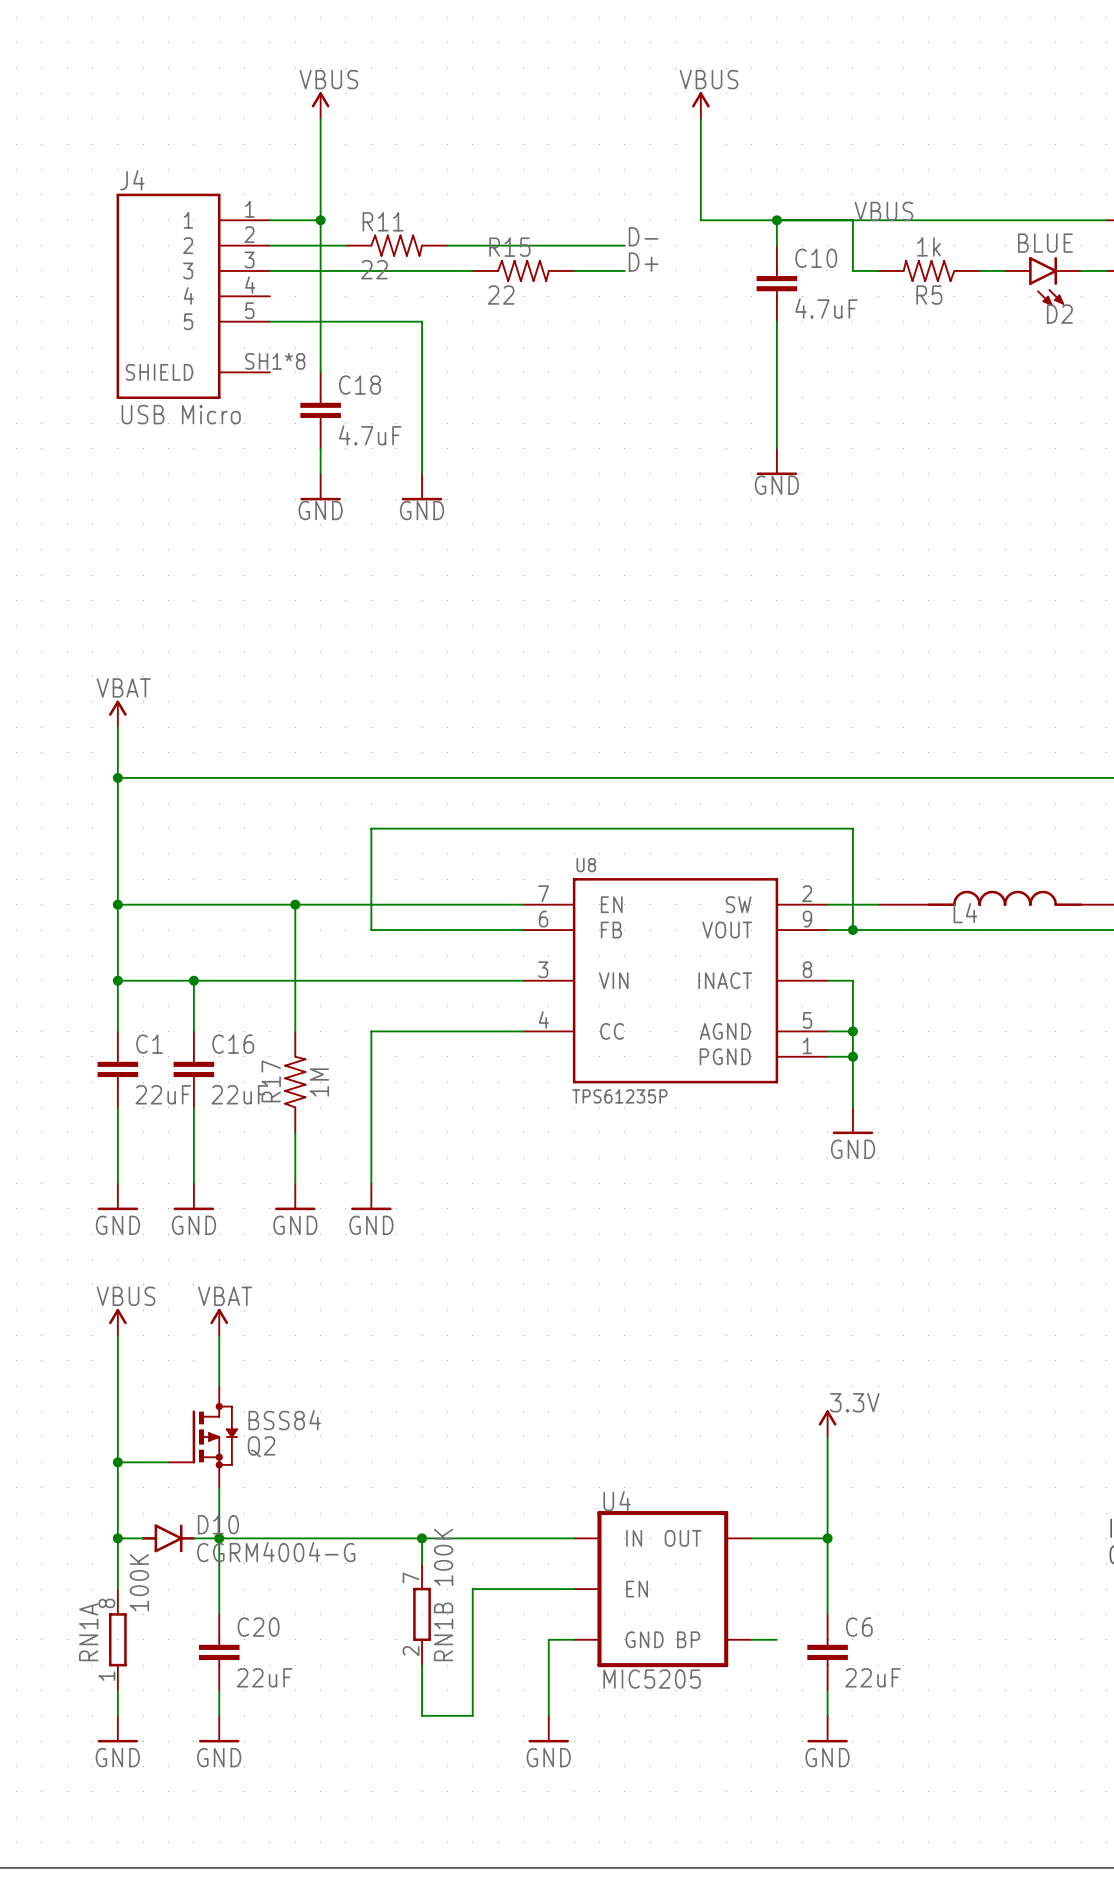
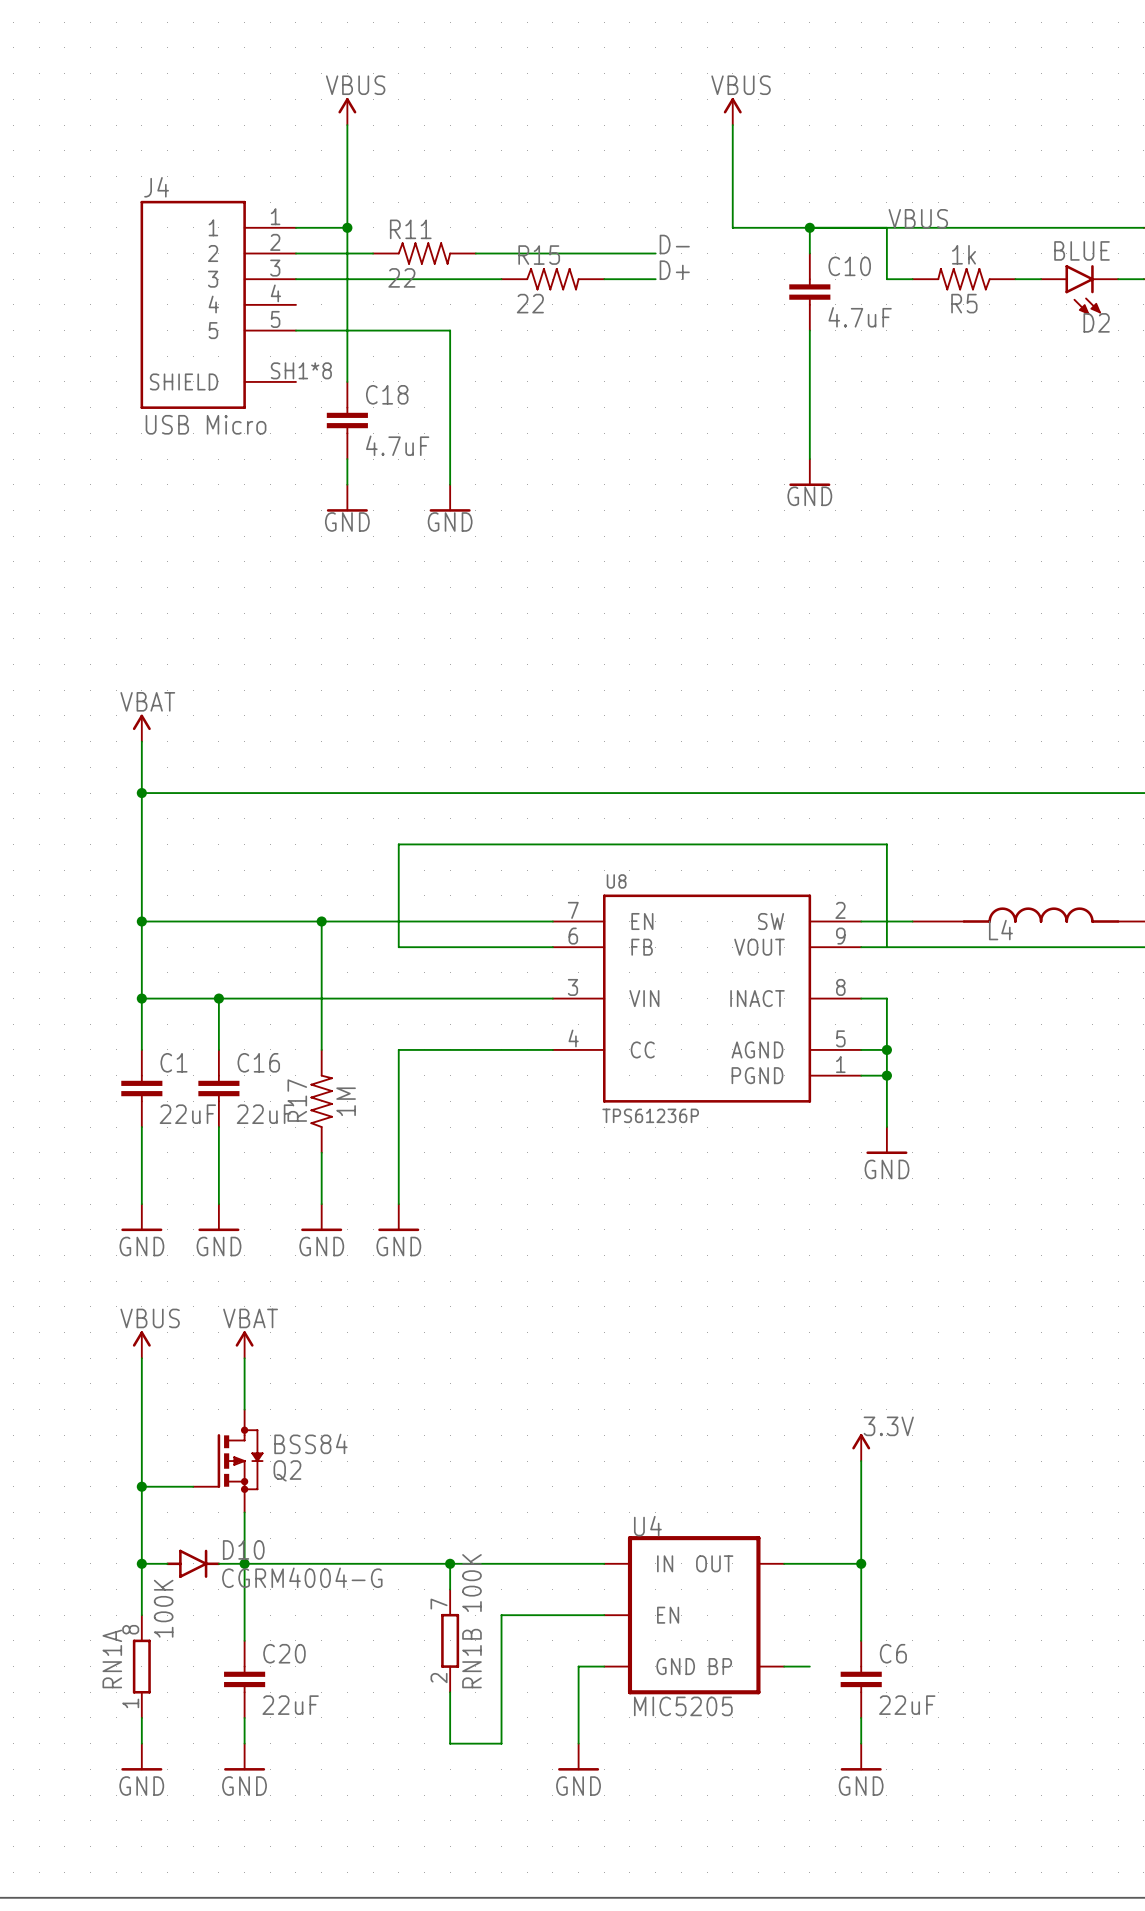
junction: (852, 930) -> none
U8 value: TPS61235P (619, 1096) -> TPS61236P (650, 1115)

